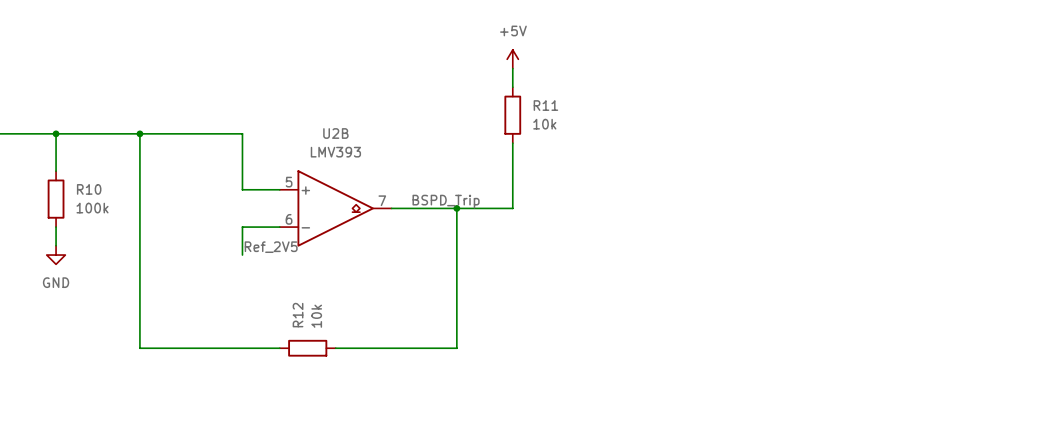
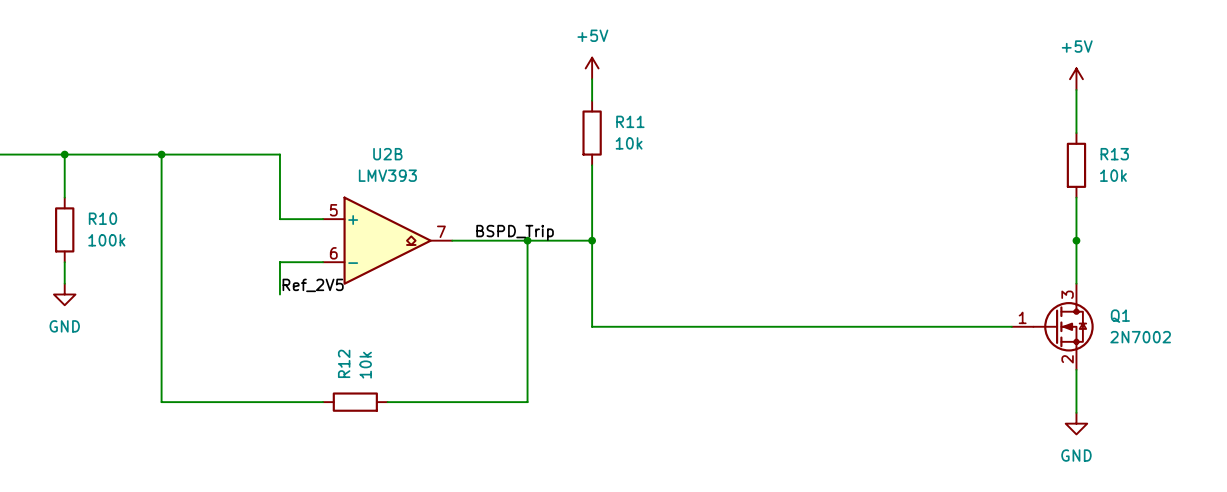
power symbol: none -> +5V (1076, 79)
wire: none -> (1076, 89) (1076, 133)
R13: none -> 10k (1076, 165)
wire: none -> (1076, 197) (1076, 283)
wire: none -> (592, 240) (592, 326) (1011, 326)
junction: none -> (592, 240)
junction: none -> (1076, 240)
Q1: none -> 2N7002 (1052, 326)
wire: none -> (1076, 369) (1076, 412)
power symbol: none -> GND (1076, 423)

